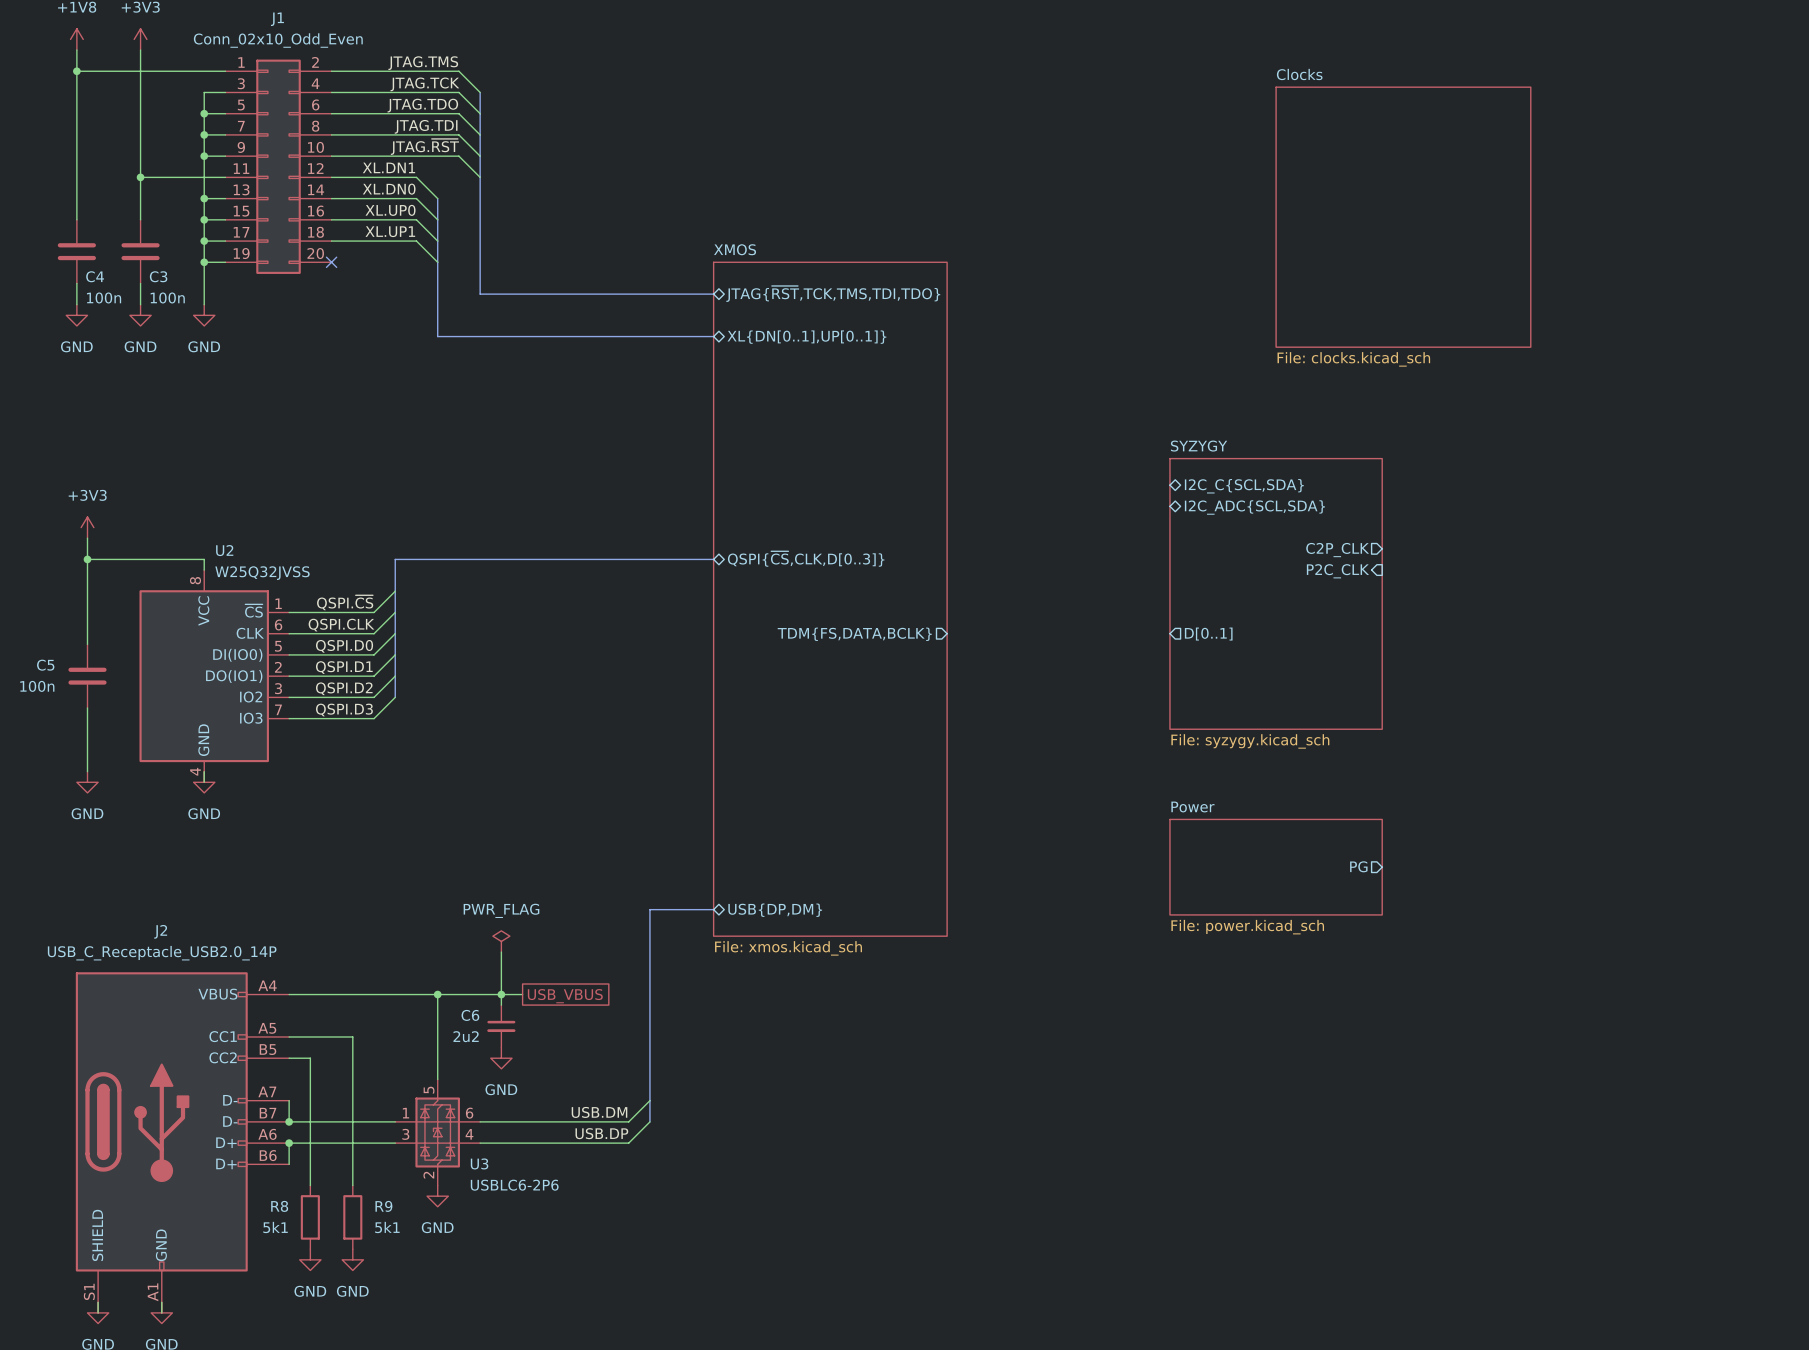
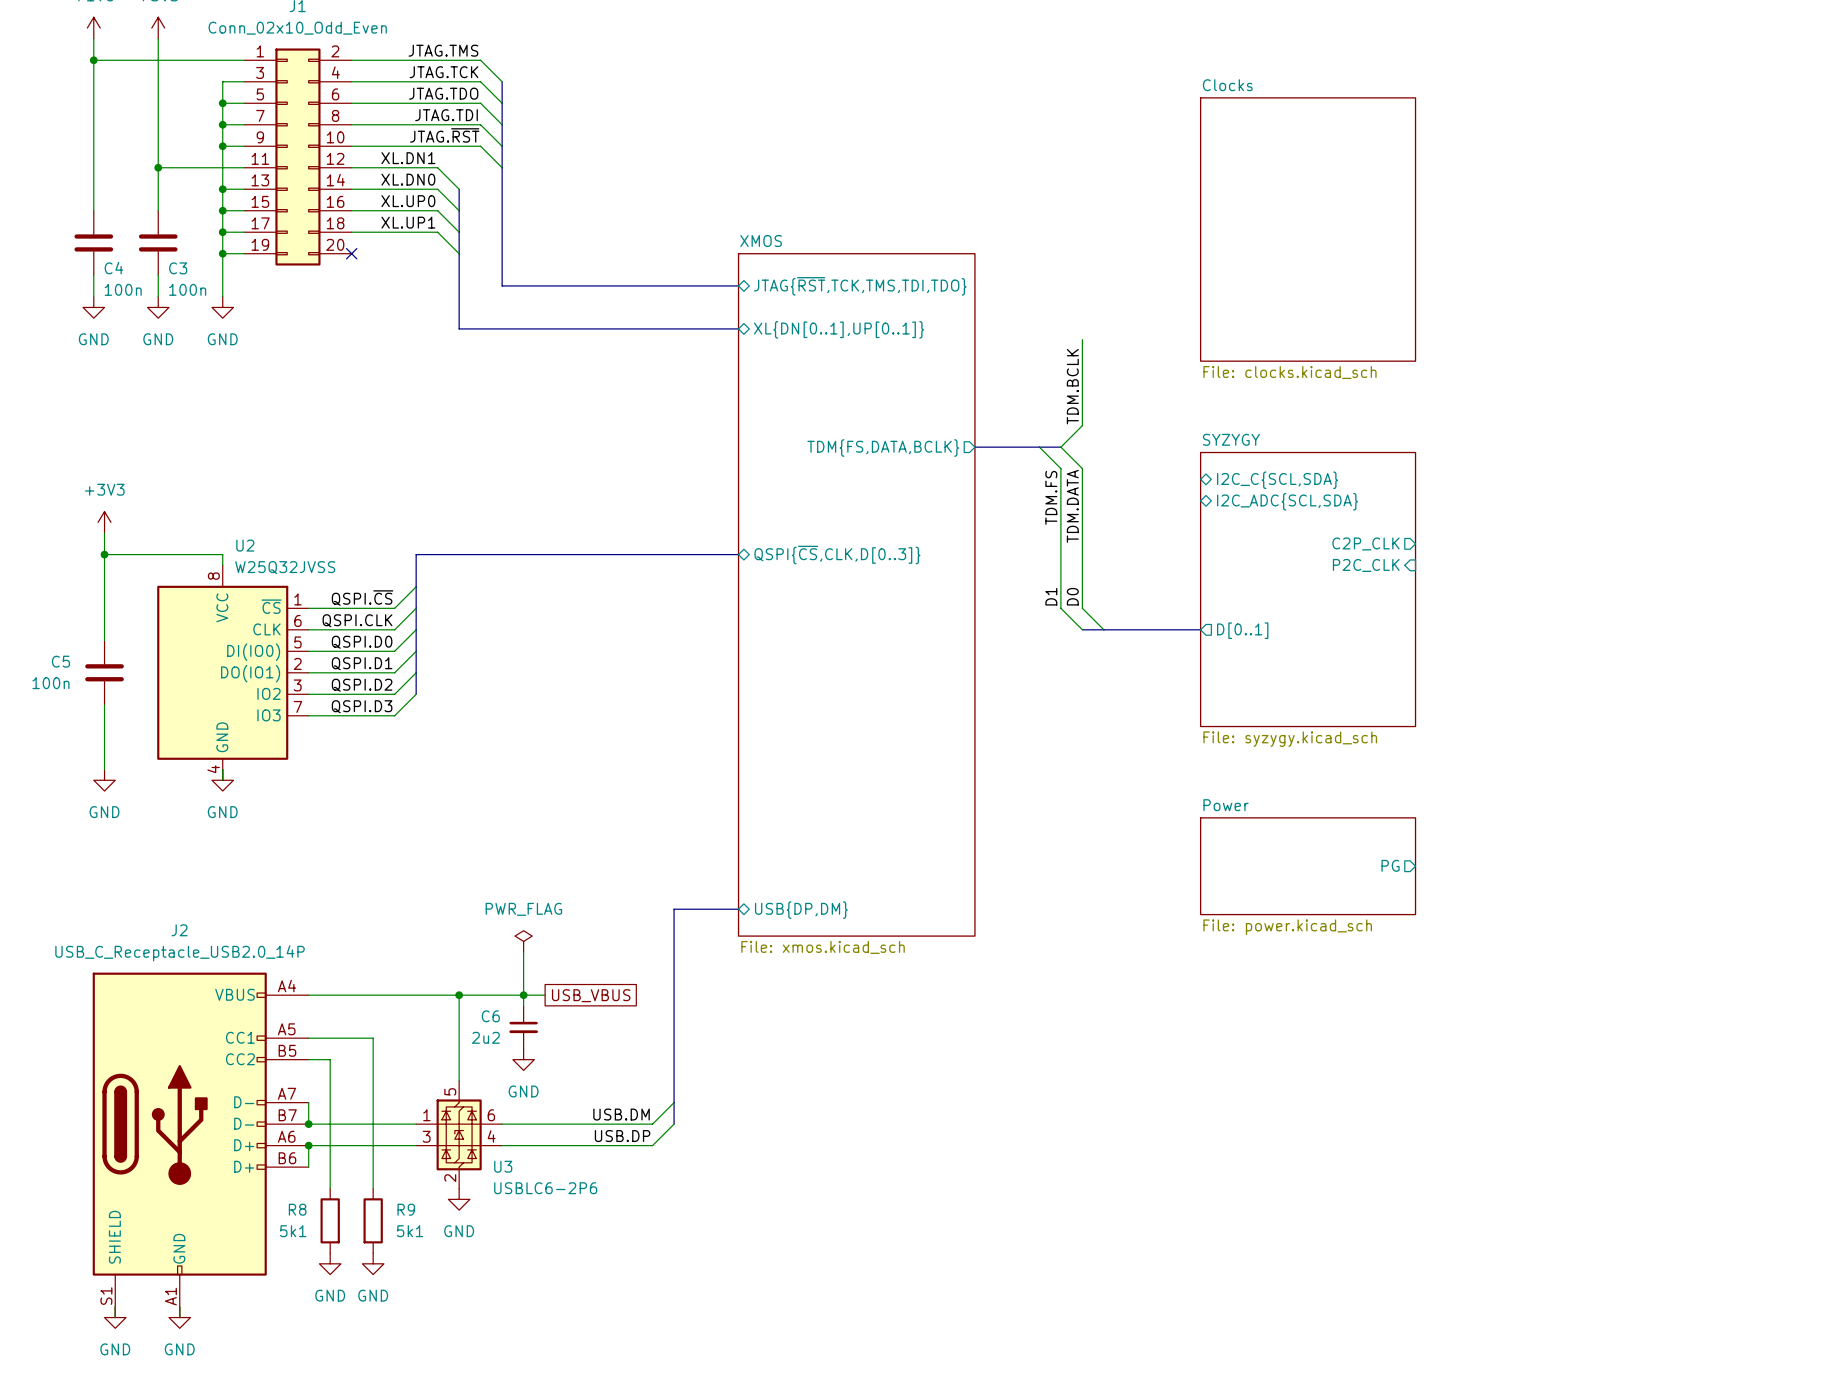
sheet Clocks: File: clocks.kicad_sch (1403, 217) -> none
sheet Clocks: none -> File: clocks.kicad_sch (1308, 229)
wire: none -> (1082, 339) (1082, 425) (1060, 447) (1082, 468) (1082, 608) (1103, 629)
label: none -> TDM.BCLK (1072, 386)
bus: none -> (974, 447) (1060, 447)
wire: none -> (1039, 447) (1060, 468) (1060, 608) (1082, 629)
label: none -> TDM.FS (1051, 497)
label: none -> TDM.DATA (1072, 506)
label: none -> D1 (1051, 596)
label: none -> D0 (1072, 596)
bus: none -> (1082, 629) (1200, 629)
sheet pin position: TDM{FS,DATA,BCLK} (854, 634) -> TDM{FS,DATA,BCLK} (883, 448)

